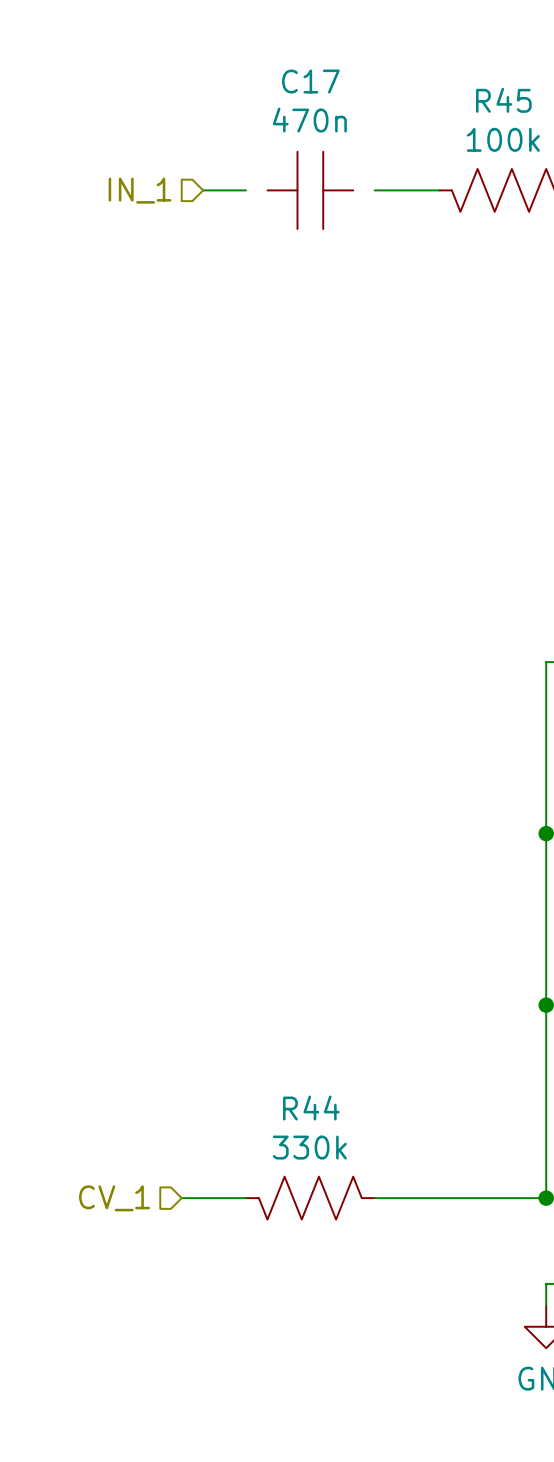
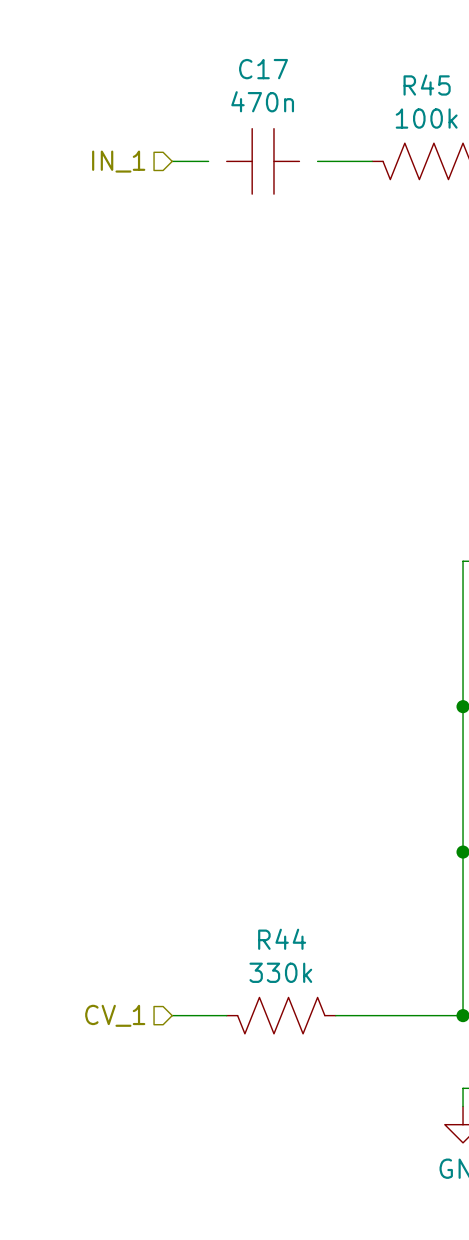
hierarchical label position: CV_1 (114, 1198) -> CV_1 (115, 1015)
wire: (181, 1198) (203, 1198) -> none
R44 position: (310, 1198) -> (281, 1015)

